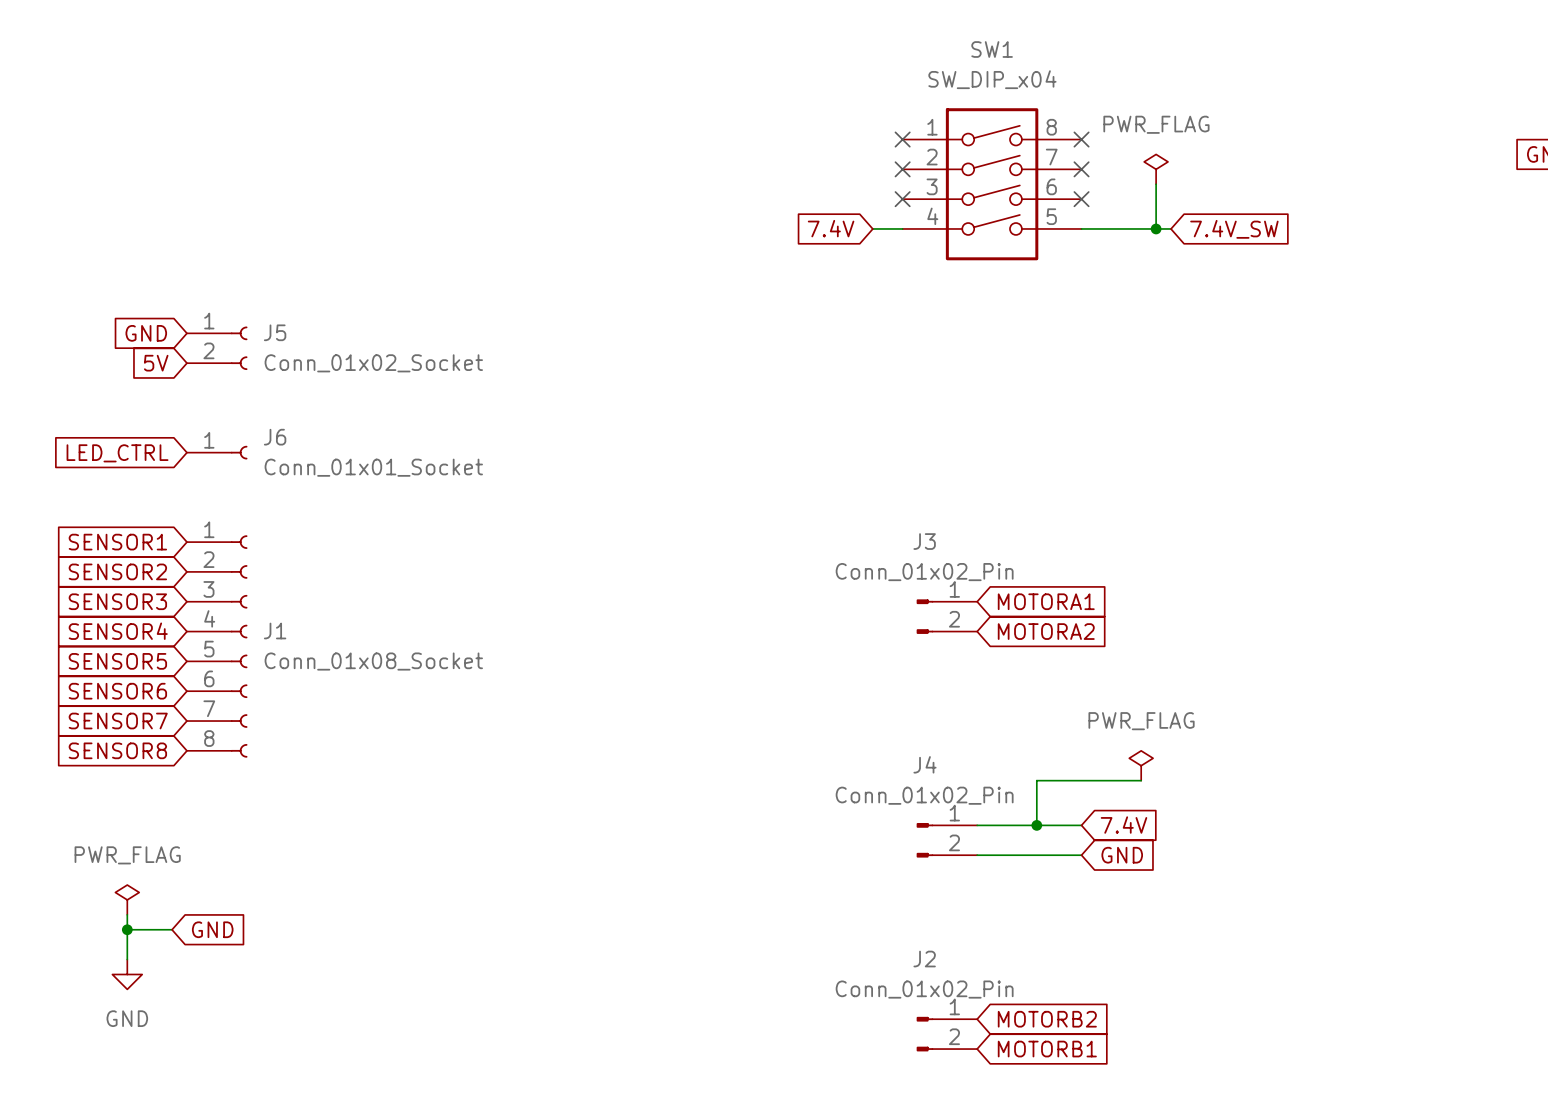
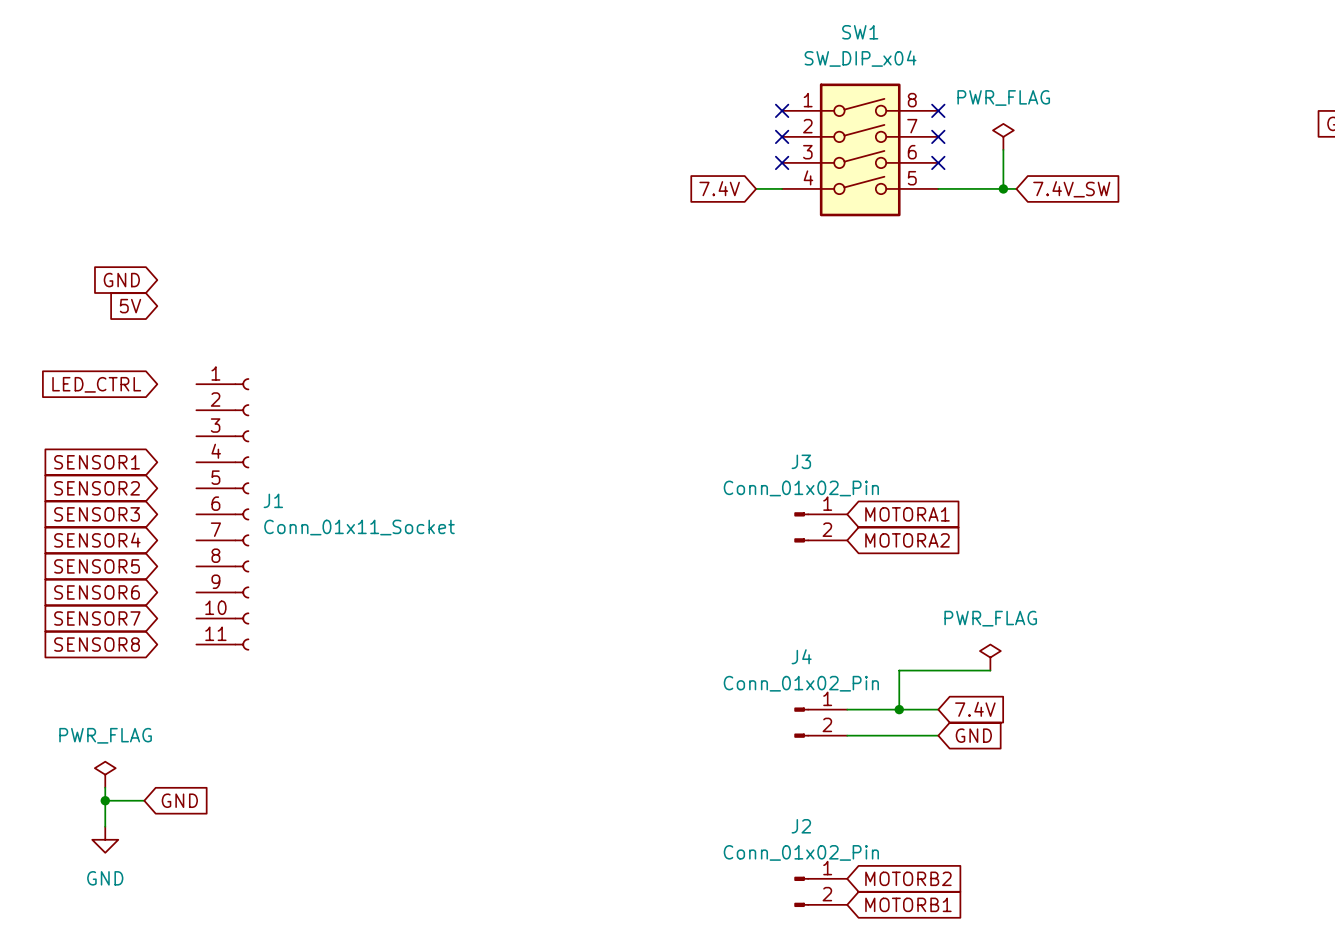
J5: Conn_01x02_Socket (217, 348) -> none
J6: Conn_01x01_Socket (217, 452) -> none
J1 symbol: [186, 535, 248, 758] -> [196, 378, 250, 651]
J1 value: Conn_01x08_Socket (373, 661) -> Conn_01x11_Socket (359, 527)

